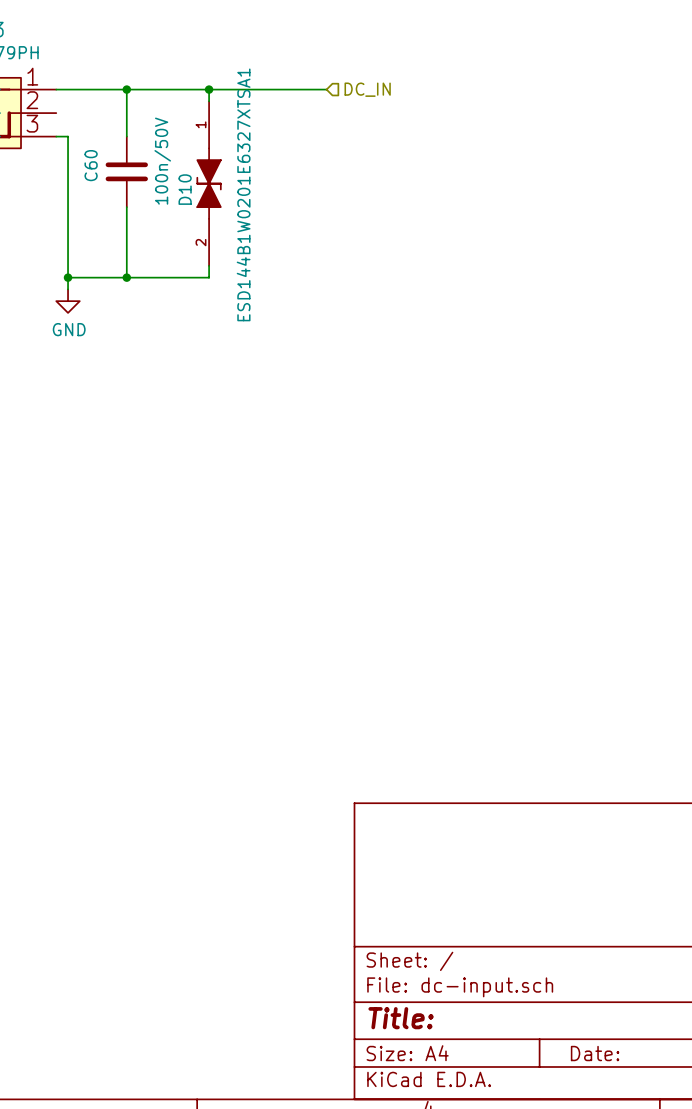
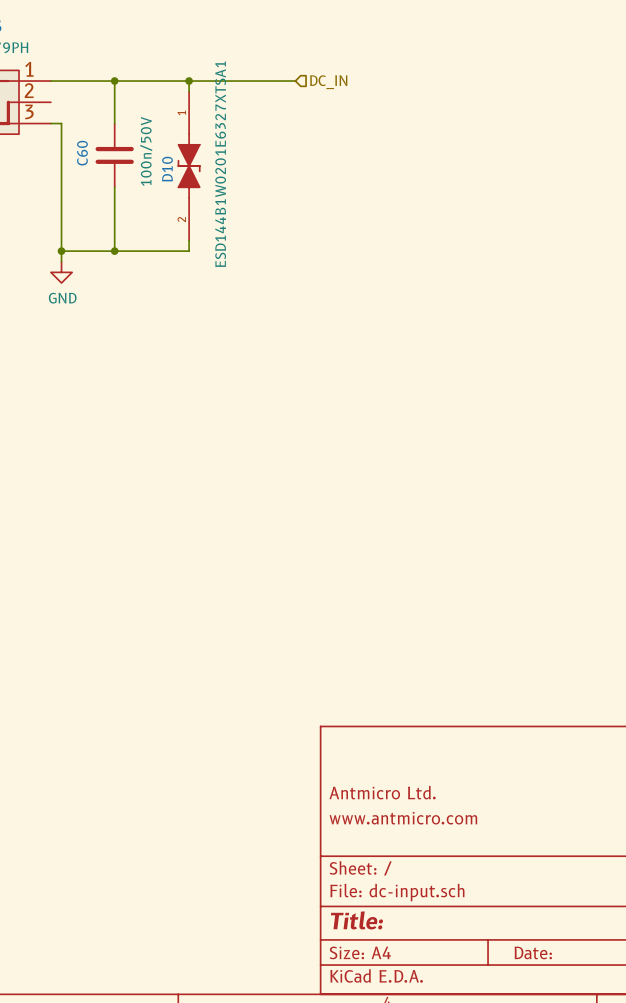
title block: none -> Antmicro Ltd. (382, 792)
title block: none -> www.antmicro.com (403, 818)

